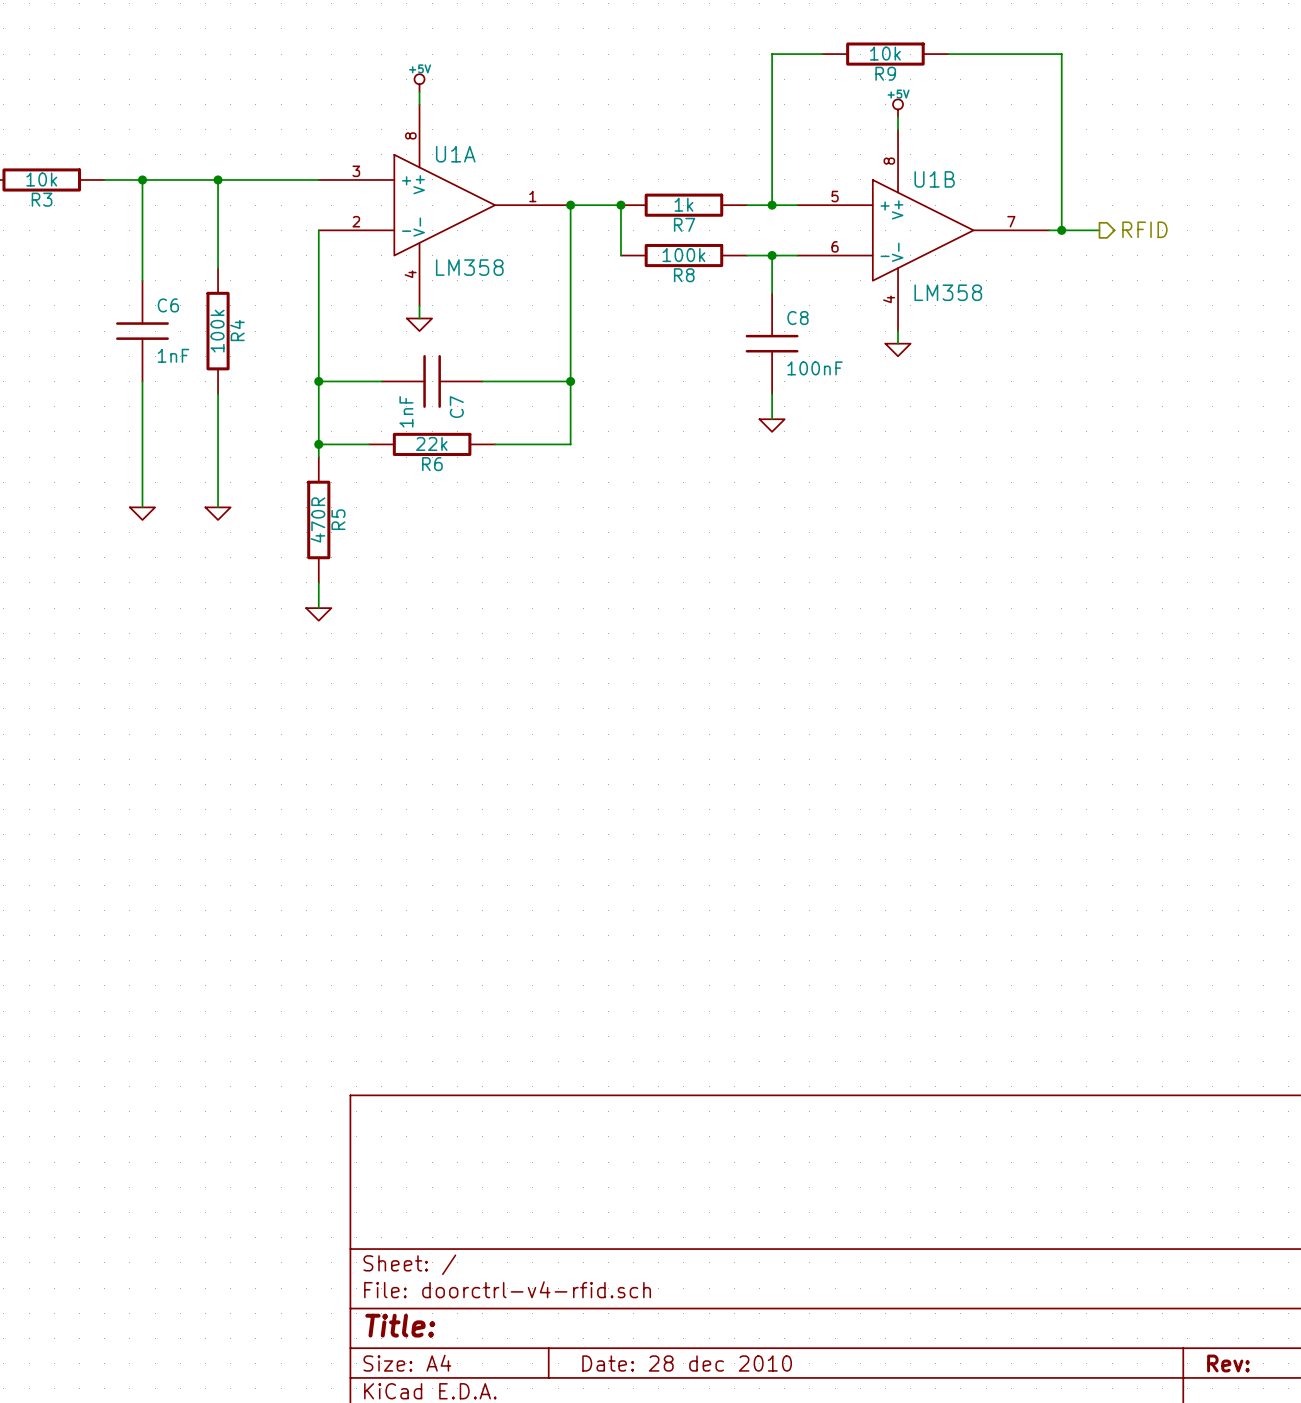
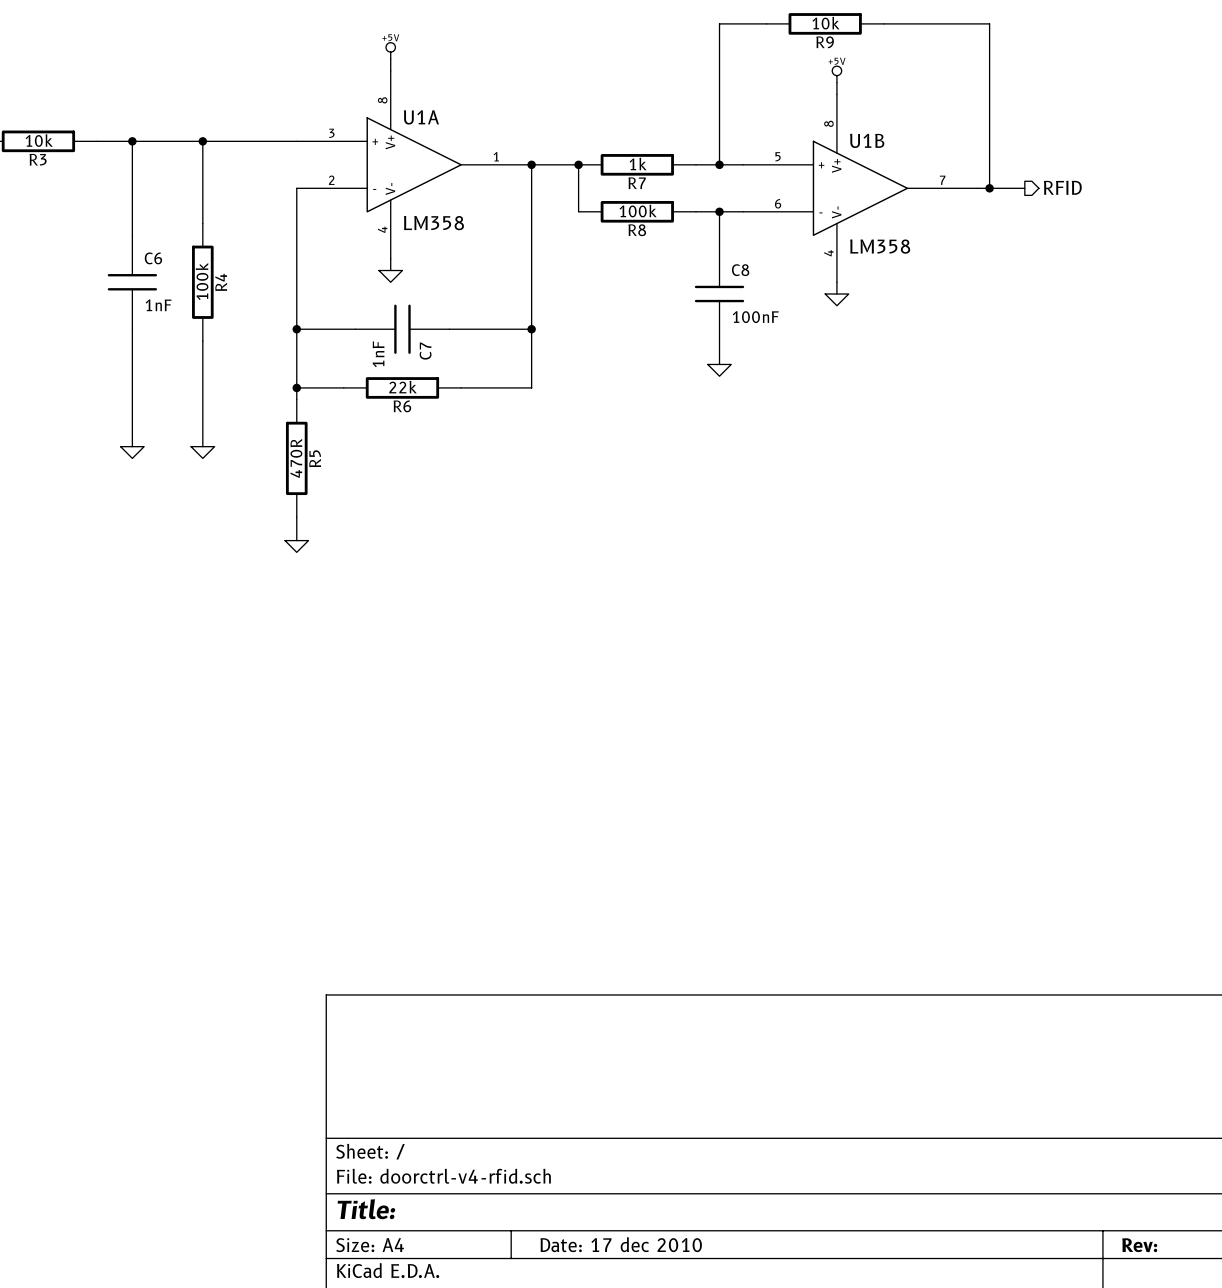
title block: Date: 28 dec 2010 (687, 1363) -> Date: 17 dec 2010 (621, 1244)

